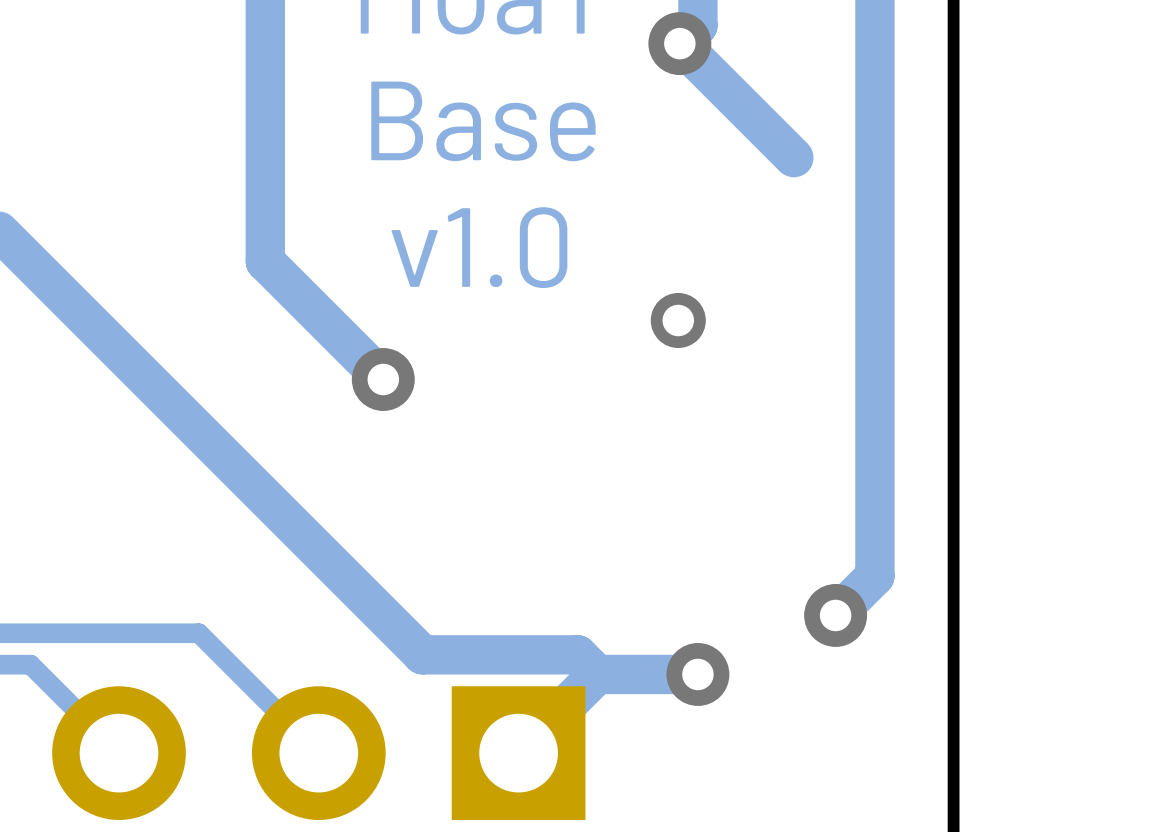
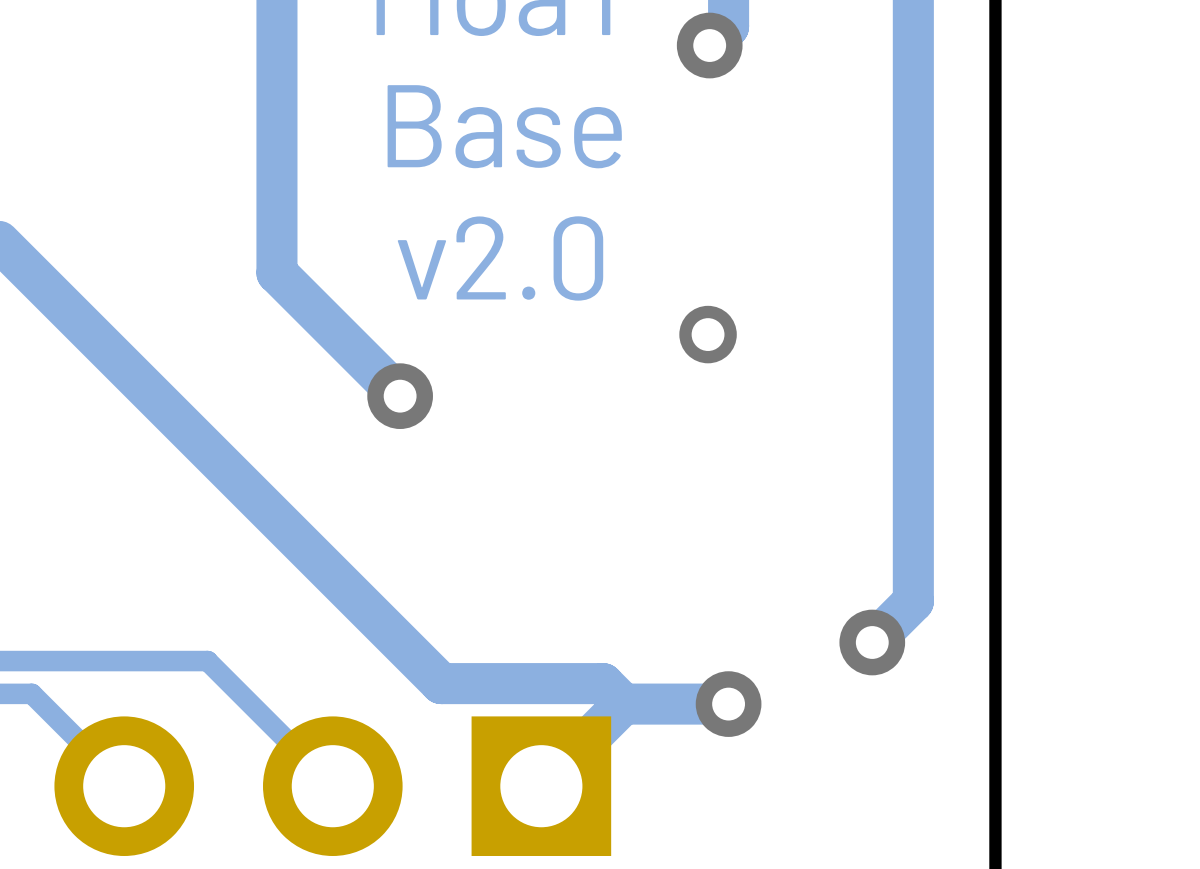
track: (679, 43) (793, 157) -> none
text: v1.0 (479, 247) -> v2.0 (500, 258)

